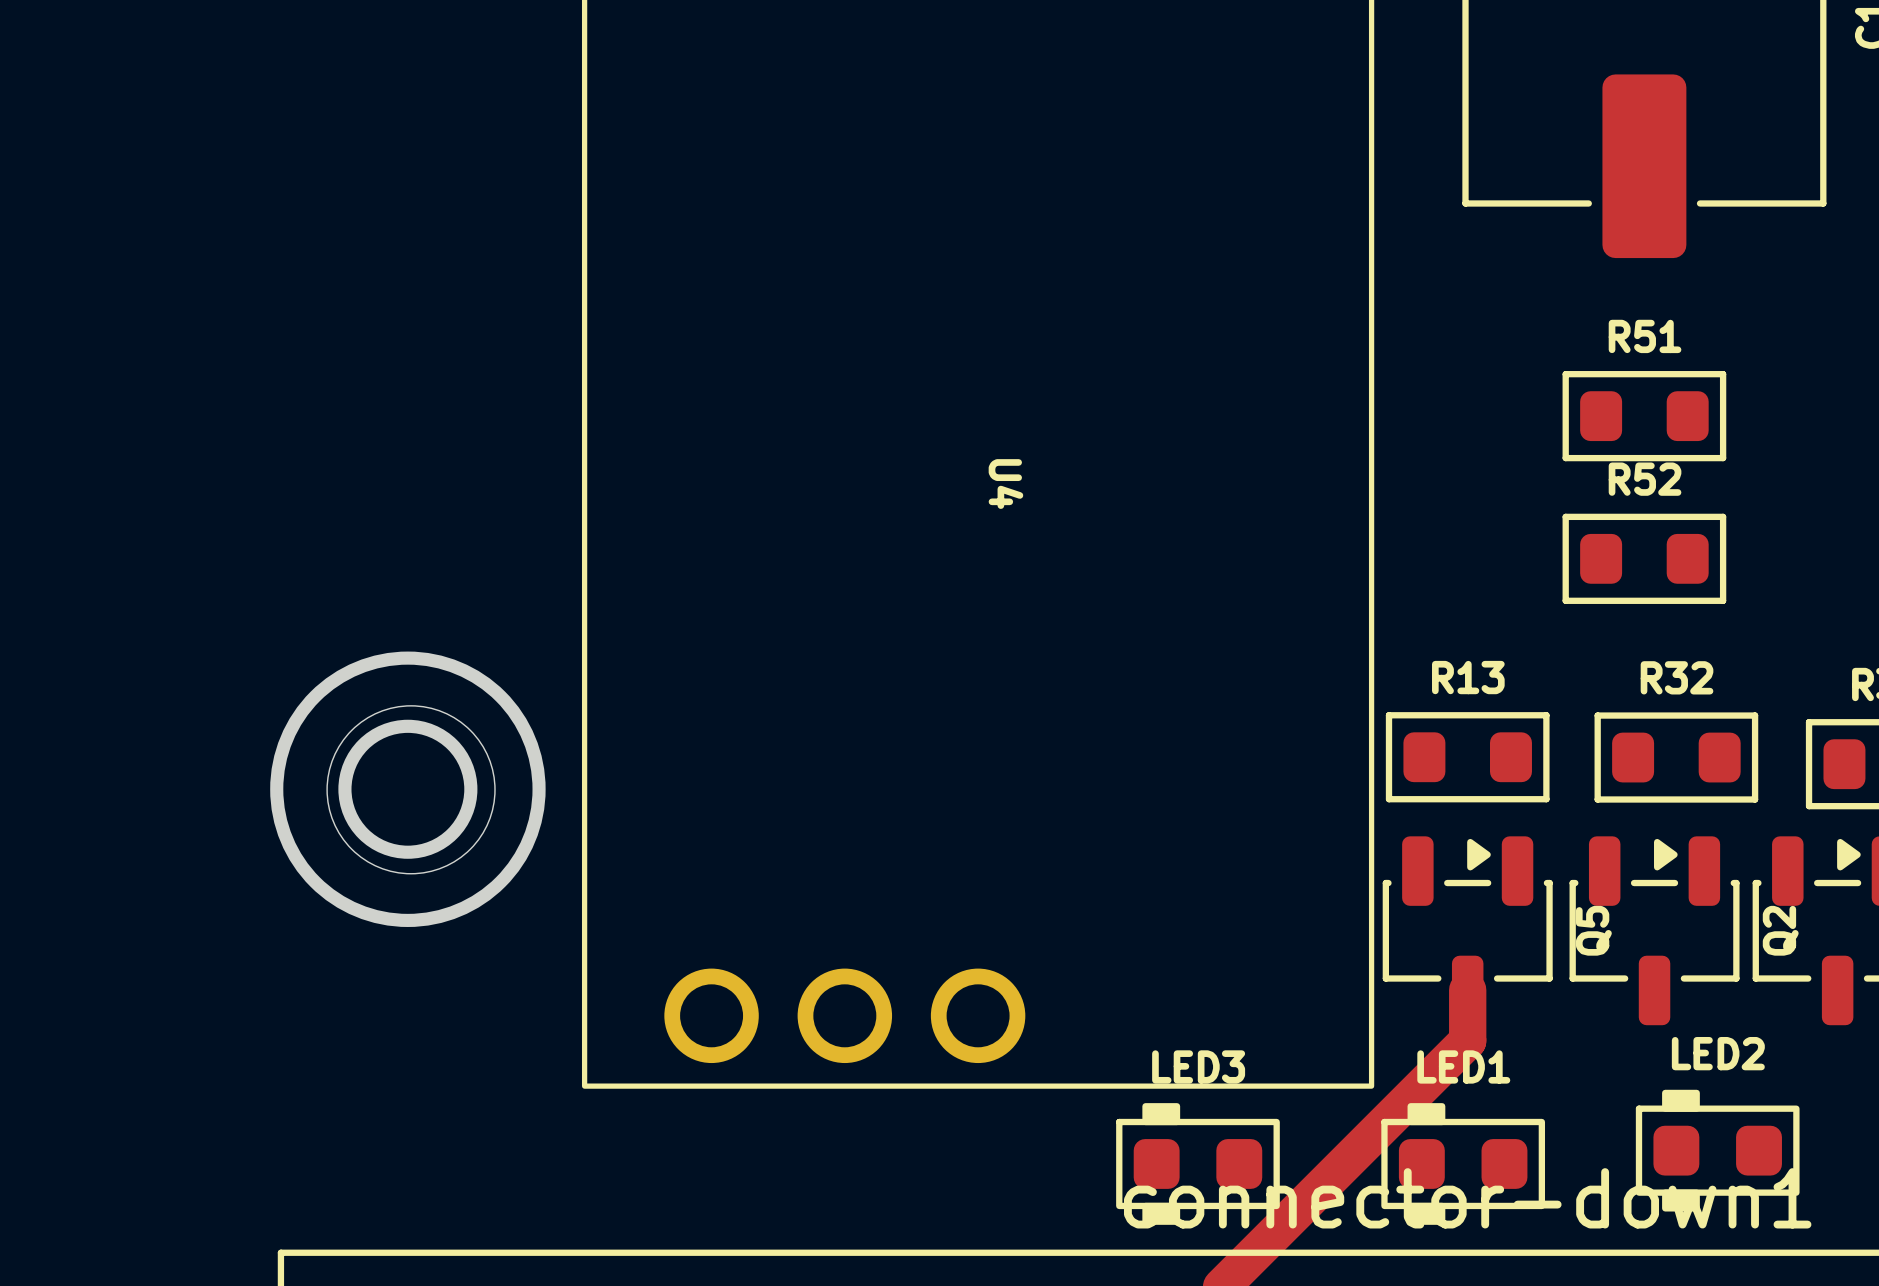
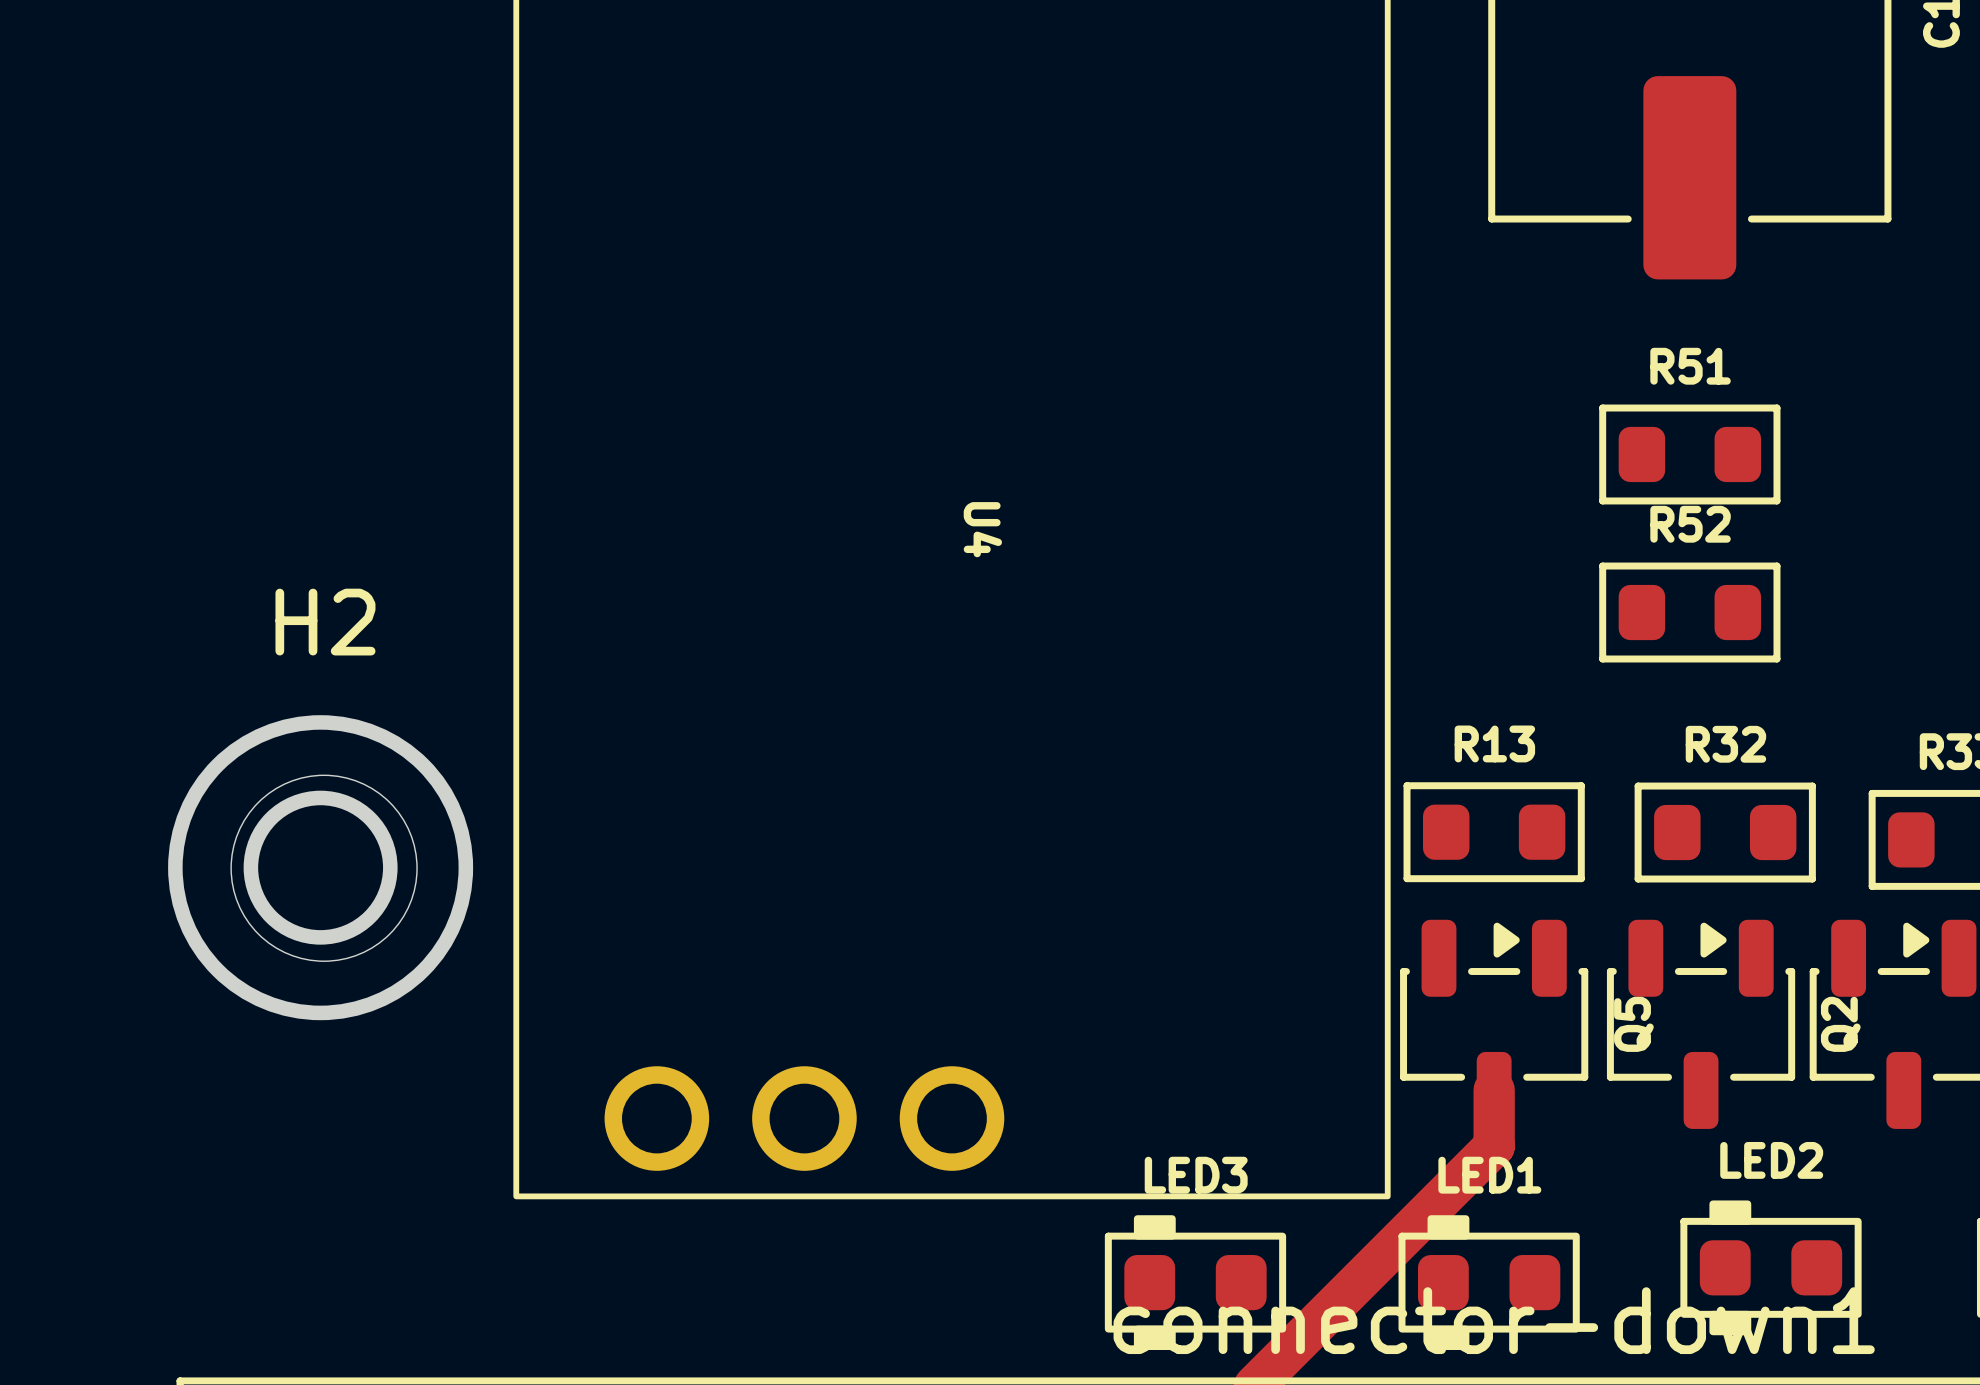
H2 name: none -> H2 (325, 622)

